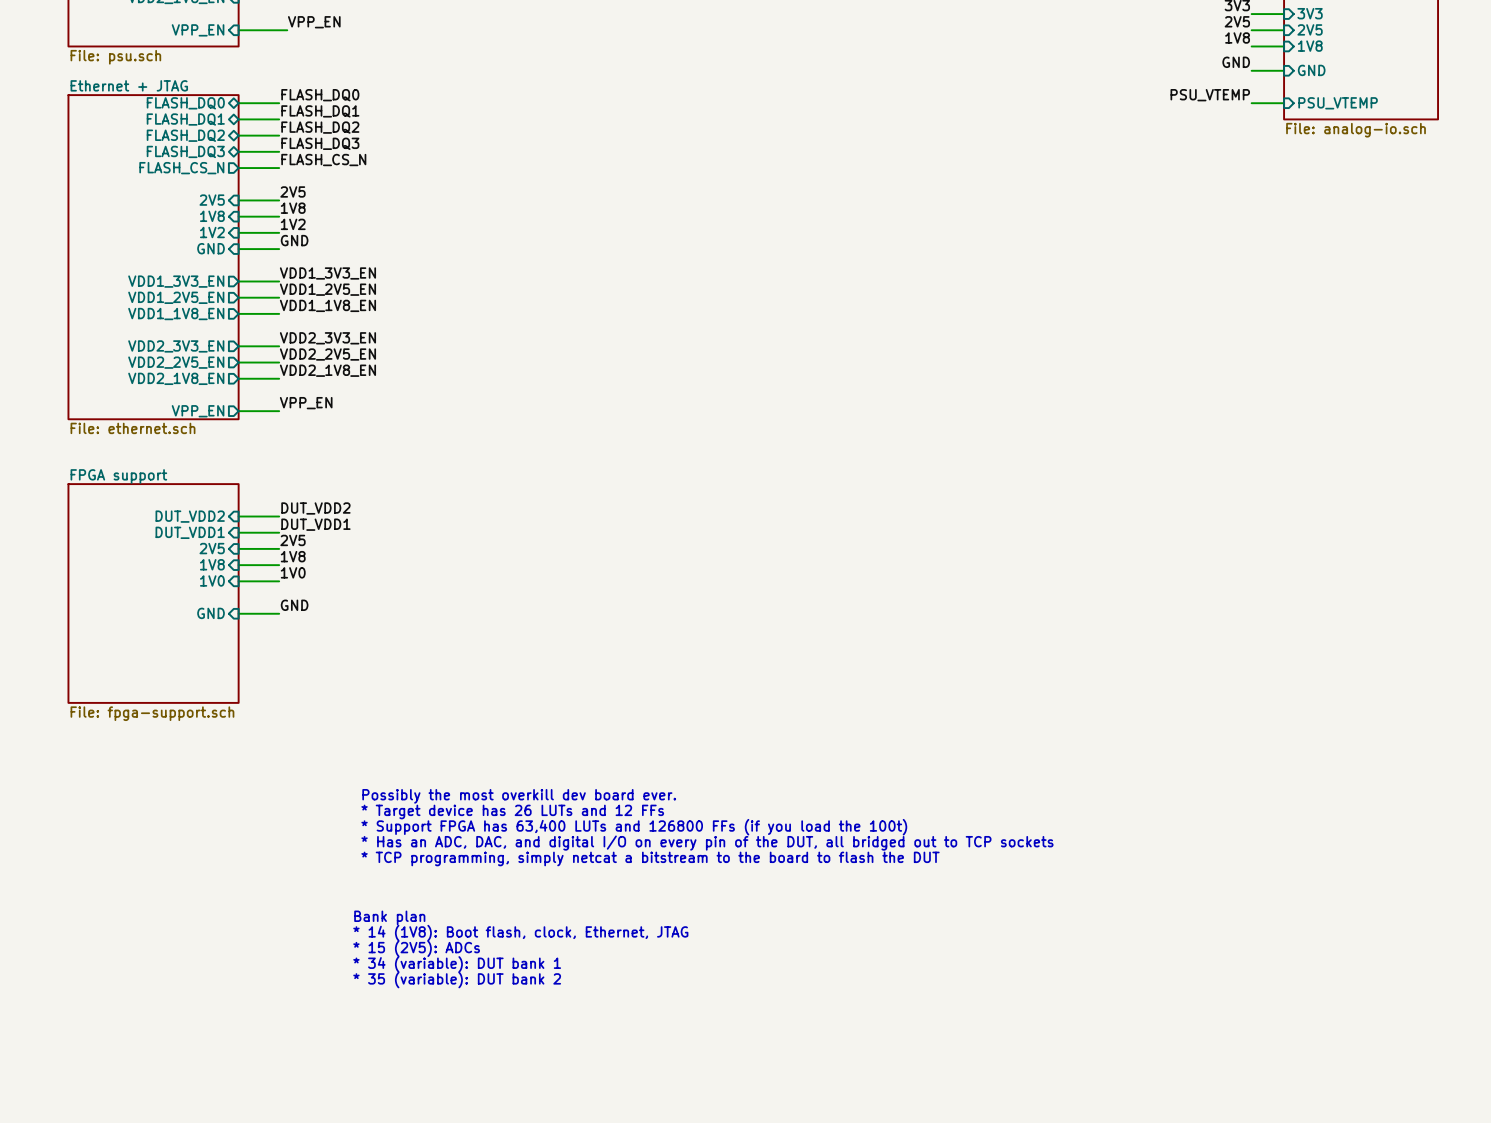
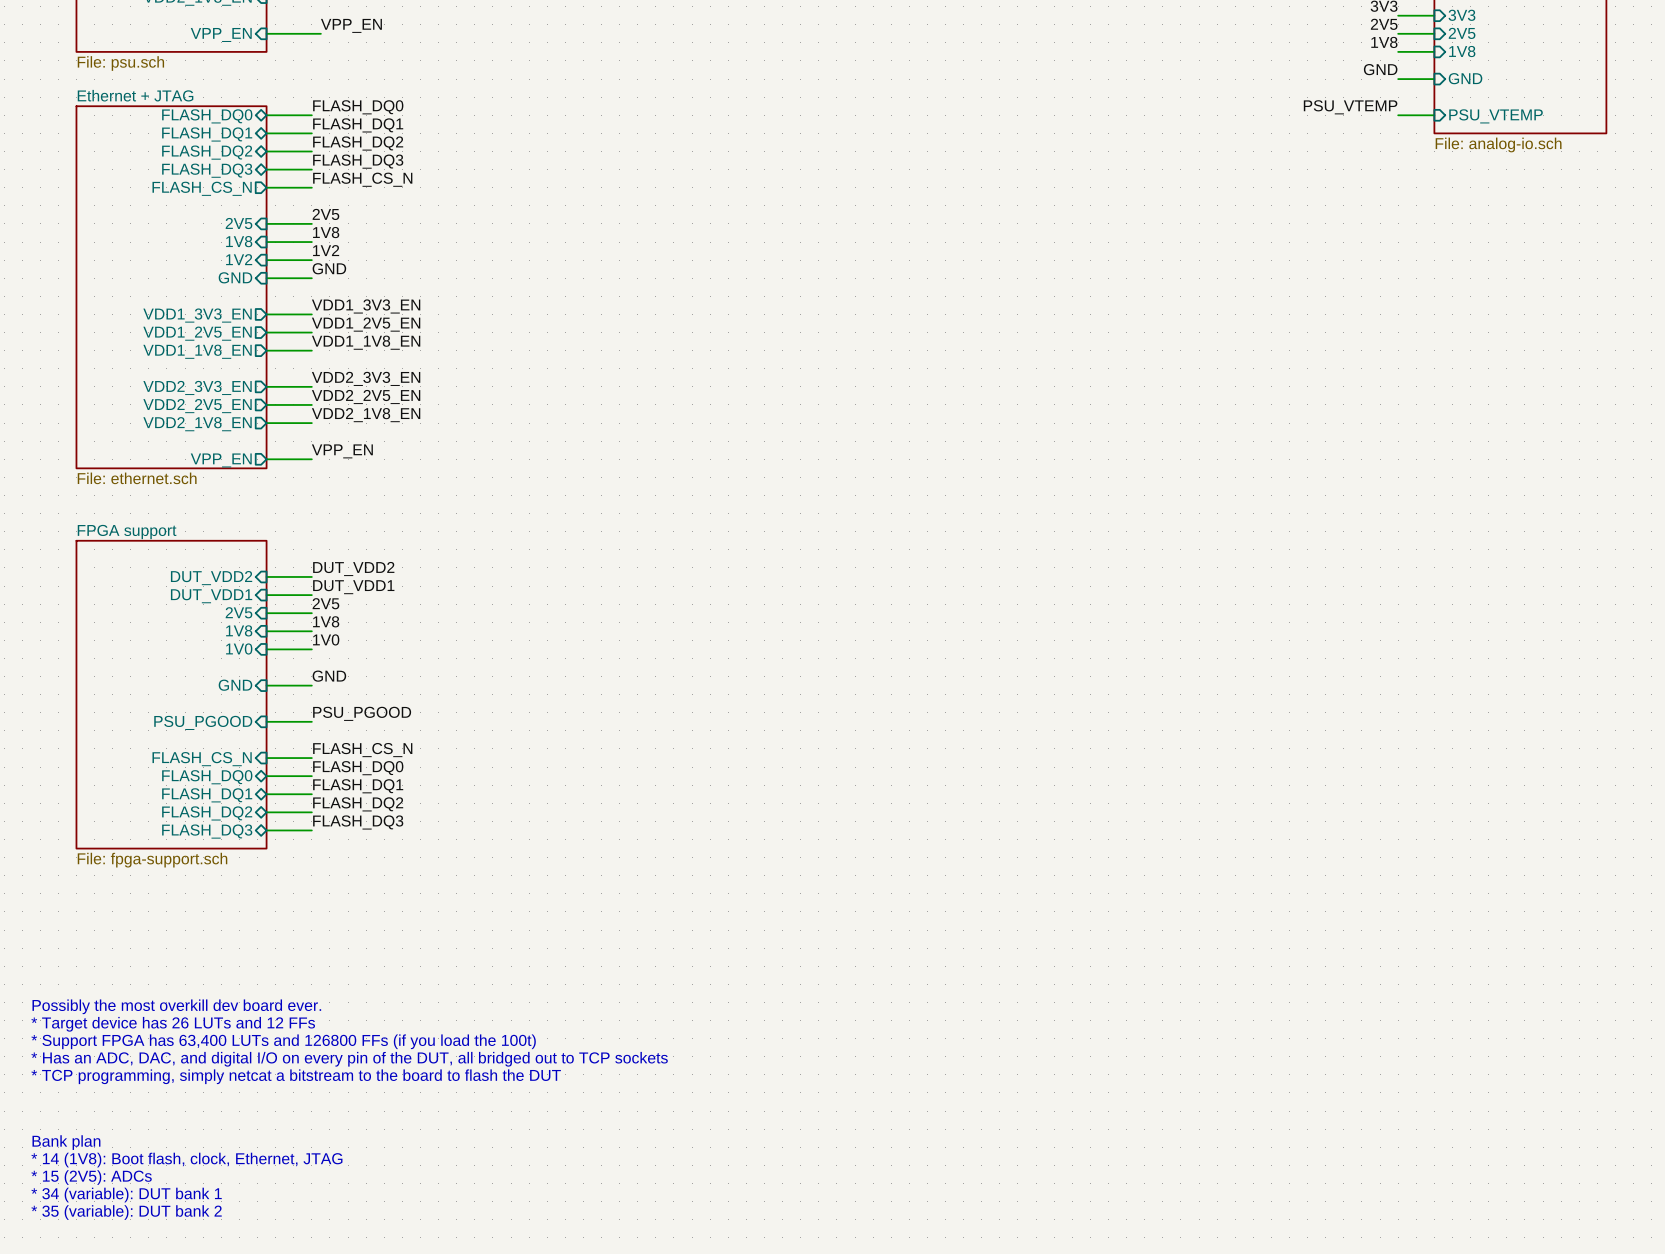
sheet FPGA support: File: fpga-support.sch (153, 593) -> none
sheet FPGA support: none -> File: fpga-support.sch (171, 694)
label: none -> PSU_PGOOD (362, 713)
sheet pin: none -> PSU_PGOOD (203, 722)
wire: none -> (266, 721) (311, 721)
label: none -> FLASH_CS_N (362, 750)
sheet pin: none -> FLASH_CS_N (202, 759)
wire: none -> (266, 758) (311, 758)
label: none -> FLASH_DQ0 (358, 768)
sheet pin: none -> FLASH_DQ0 (207, 777)
wire: none -> (266, 776) (311, 776)
label: none -> FLASH_DQ1 (358, 786)
sheet pin: none -> FLASH_DQ1 (207, 795)
wire: none -> (266, 794) (311, 794)
label: none -> FLASH_DQ2 (358, 804)
sheet pin: none -> FLASH_DQ2 (207, 813)
wire: none -> (266, 812) (311, 812)
label: none -> FLASH_DQ3 (358, 822)
sheet pin: none -> FLASH_DQ3 (207, 831)
wire: none -> (266, 830) (311, 830)
text: Possibly the most overkill dev board ever. (519, 796) -> none
text: * Target device has 26 LUTs and 12 FFs (512, 811) -> none
text: * Support FPGA has 63,400 LUTs and 126800 FFs (if you load the 100t) (634, 827) -> none
text: * Has an ADC, DAC, and digital I/O on every pin of the DUT, all bridged out to TCP sockets (707, 843) -> none
text: * TCP programming, simply netcat a bitstream to the board to flash the DUT (650, 858) -> none
text: none -> Possibly the most overkill dev board ever. (176, 1006)
text: none -> * Target device has 26 LUTs and 12 FFs (173, 1024)
text: Bank plan (389, 917) -> none
text: none -> * Support FPGA has 63,400 LUTs and 126800 FFs (if you load the 100t) (283, 1041)
text: * 14 (1V8): Boot flash, clock, Ethernet, JTAG (520, 933) -> none
text: none -> * Has an ADC, DAC, and digital I/O on every pin of the DUT, all bridged out to TCP sockets (349, 1059)
text: * 15 (2V5): ADCs (416, 948) -> none
text: none -> * TCP programming, simply netcat a bitstream to the board to flash the DUT (296, 1076)
text: * 34 (variable): DUT bank 1 (457, 964) -> none
text: * 35 (variable): DUT bank 2 (457, 980) -> none
text: none -> Bank plan (66, 1142)
text: none -> * 14 (1V8): Boot flash, clock, Ethernet, JTAG (186, 1160)
text: none -> * 15 (2V5): ADCs (91, 1177)
text: none -> * 34 (variable): DUT bank 1 (126, 1195)
text: none -> * 35 (variable): DUT bank 2 (126, 1212)

